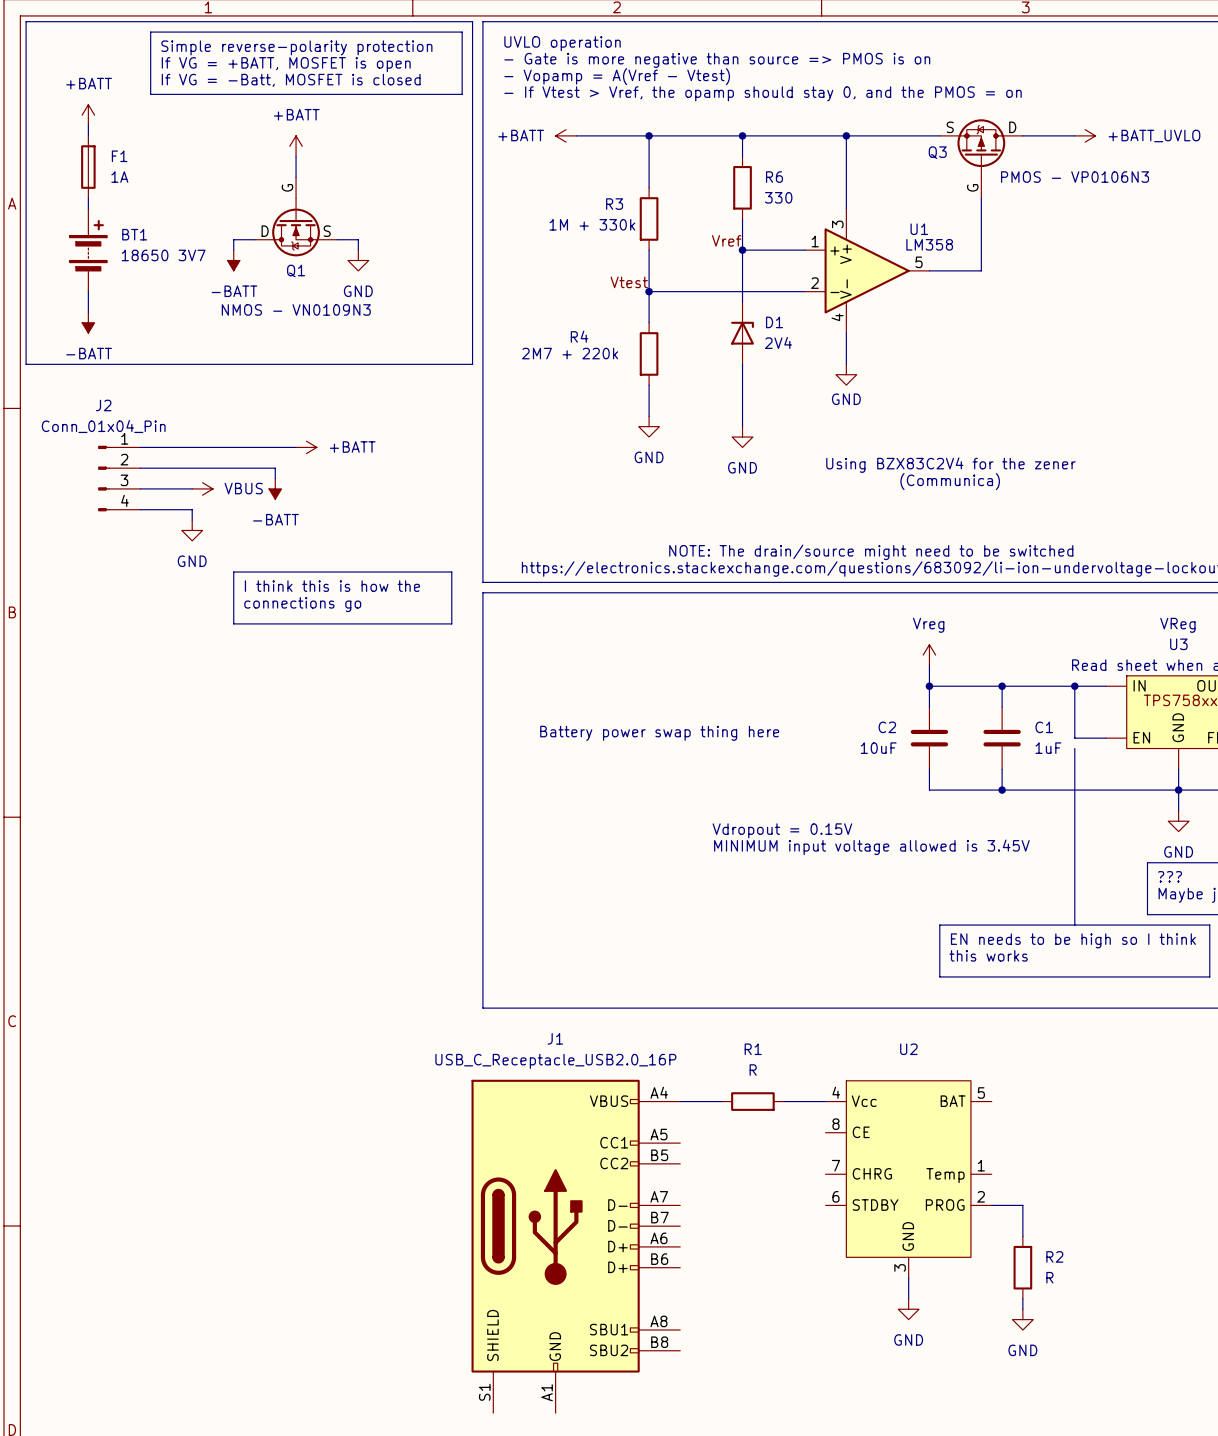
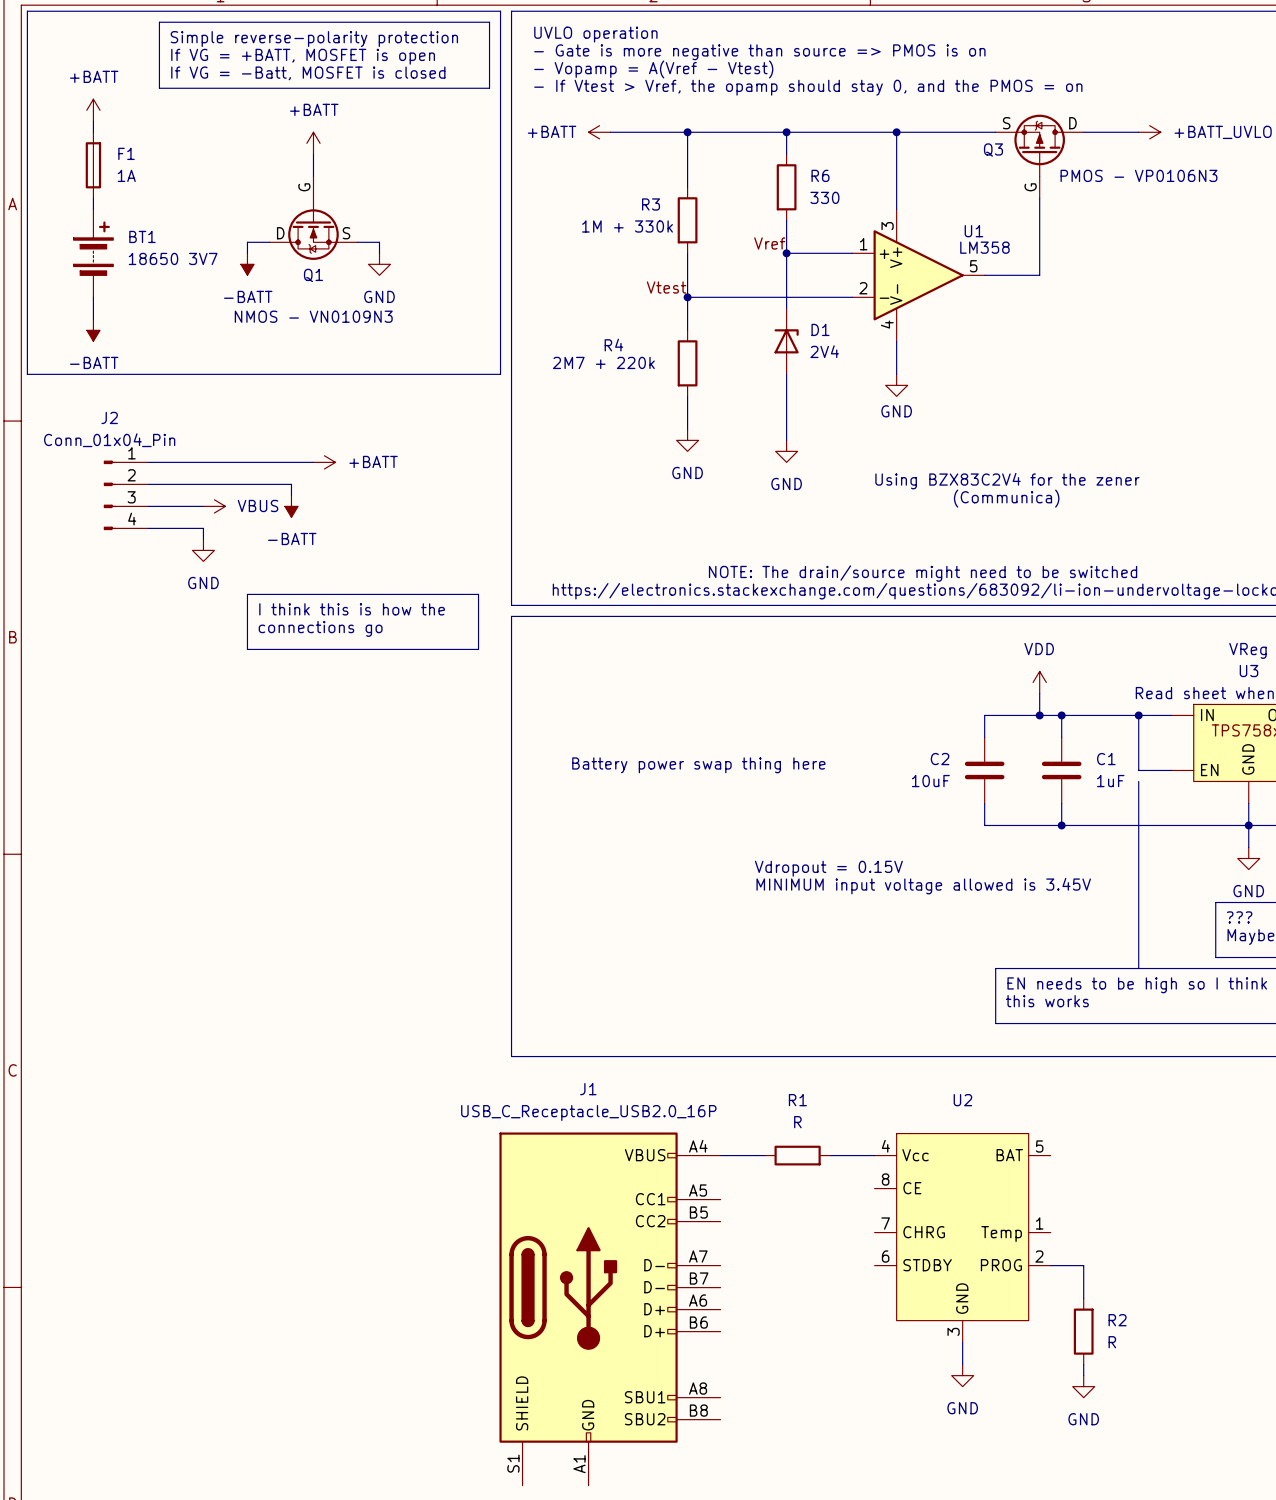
power symbol: Vreg (929, 655) -> none
power symbol: none -> VDD (1039, 682)
wire: (929, 665) (929, 686) -> (1039, 693) (1039, 715)
junction: (929, 686) -> none
junction: none -> (1039, 715)

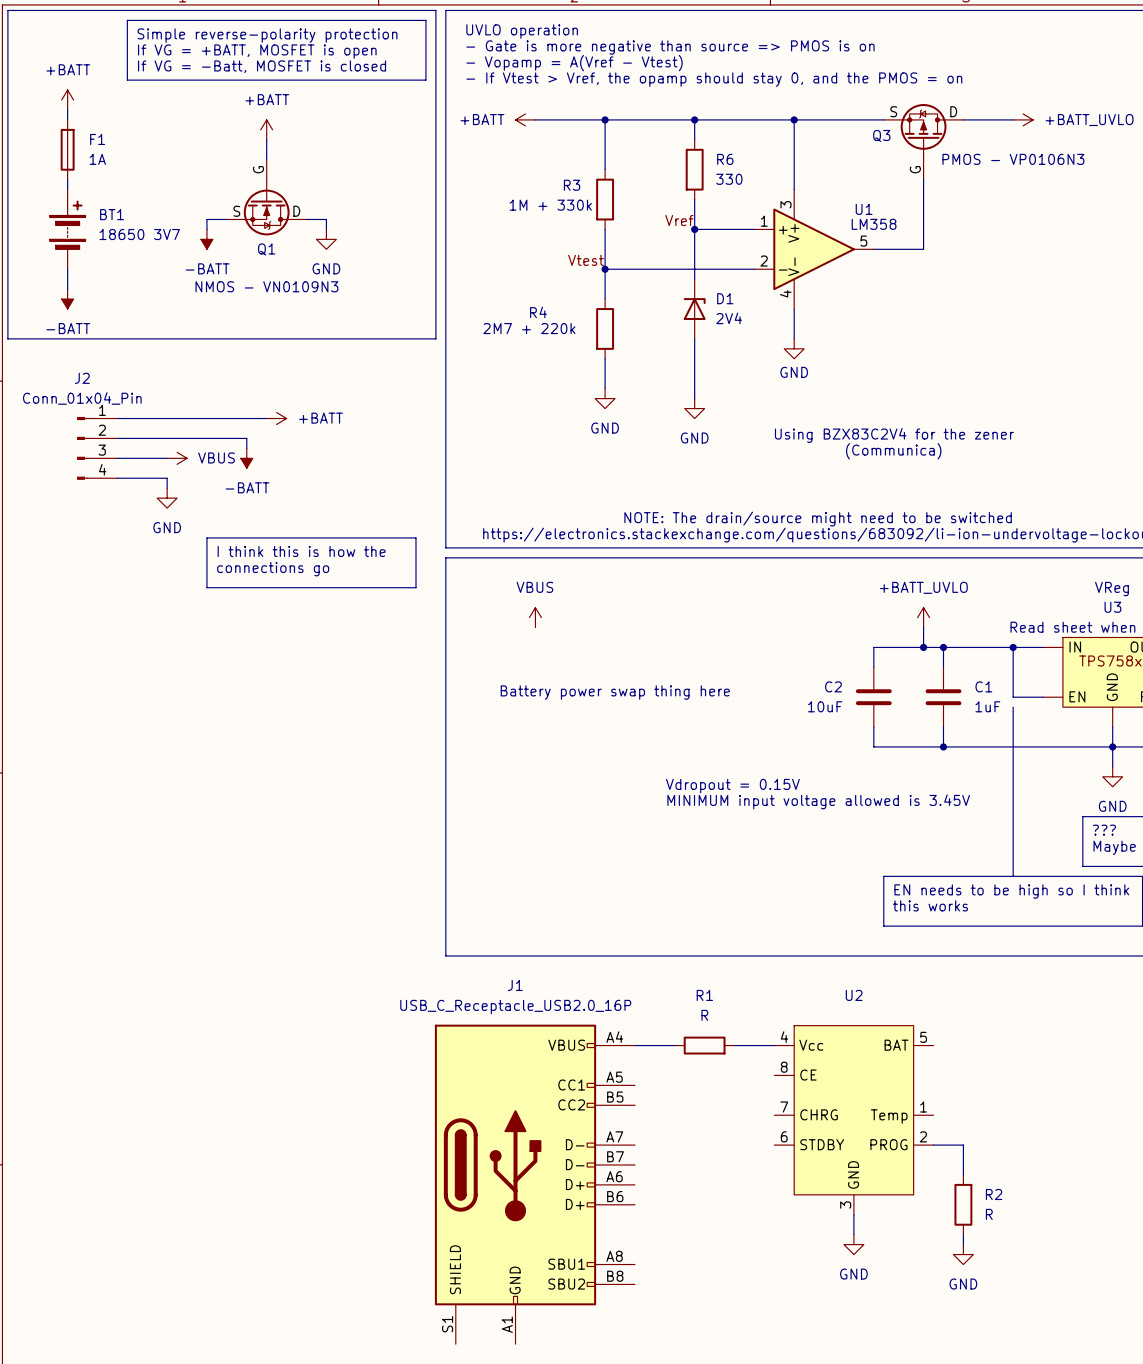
Q1 flip: as is (313, 229) -> left-right (266, 207)
power symbol: none -> VBUS (535, 617)
power symbol: VDD (1039, 682) -> +BATT_UVLO (923, 617)

